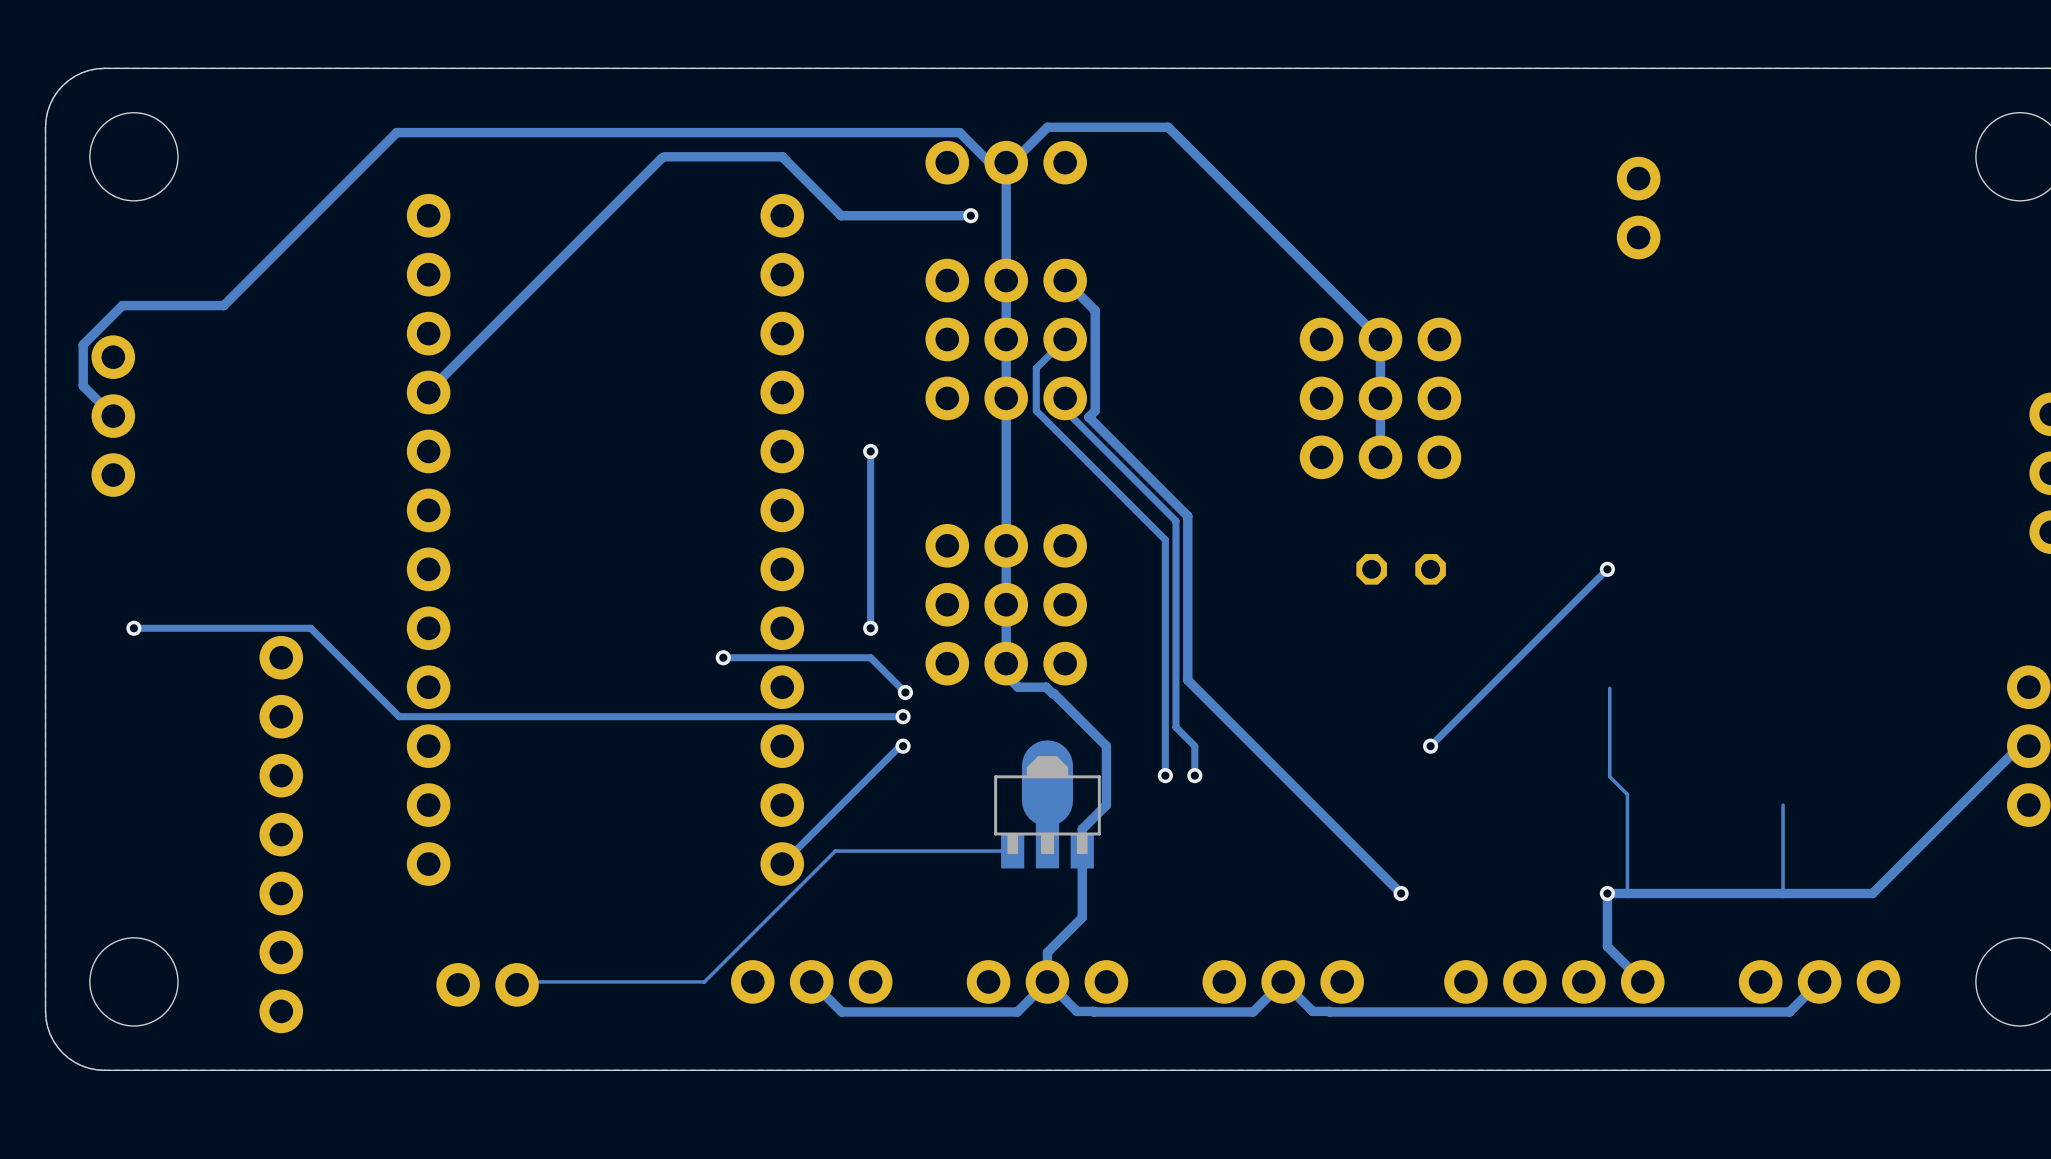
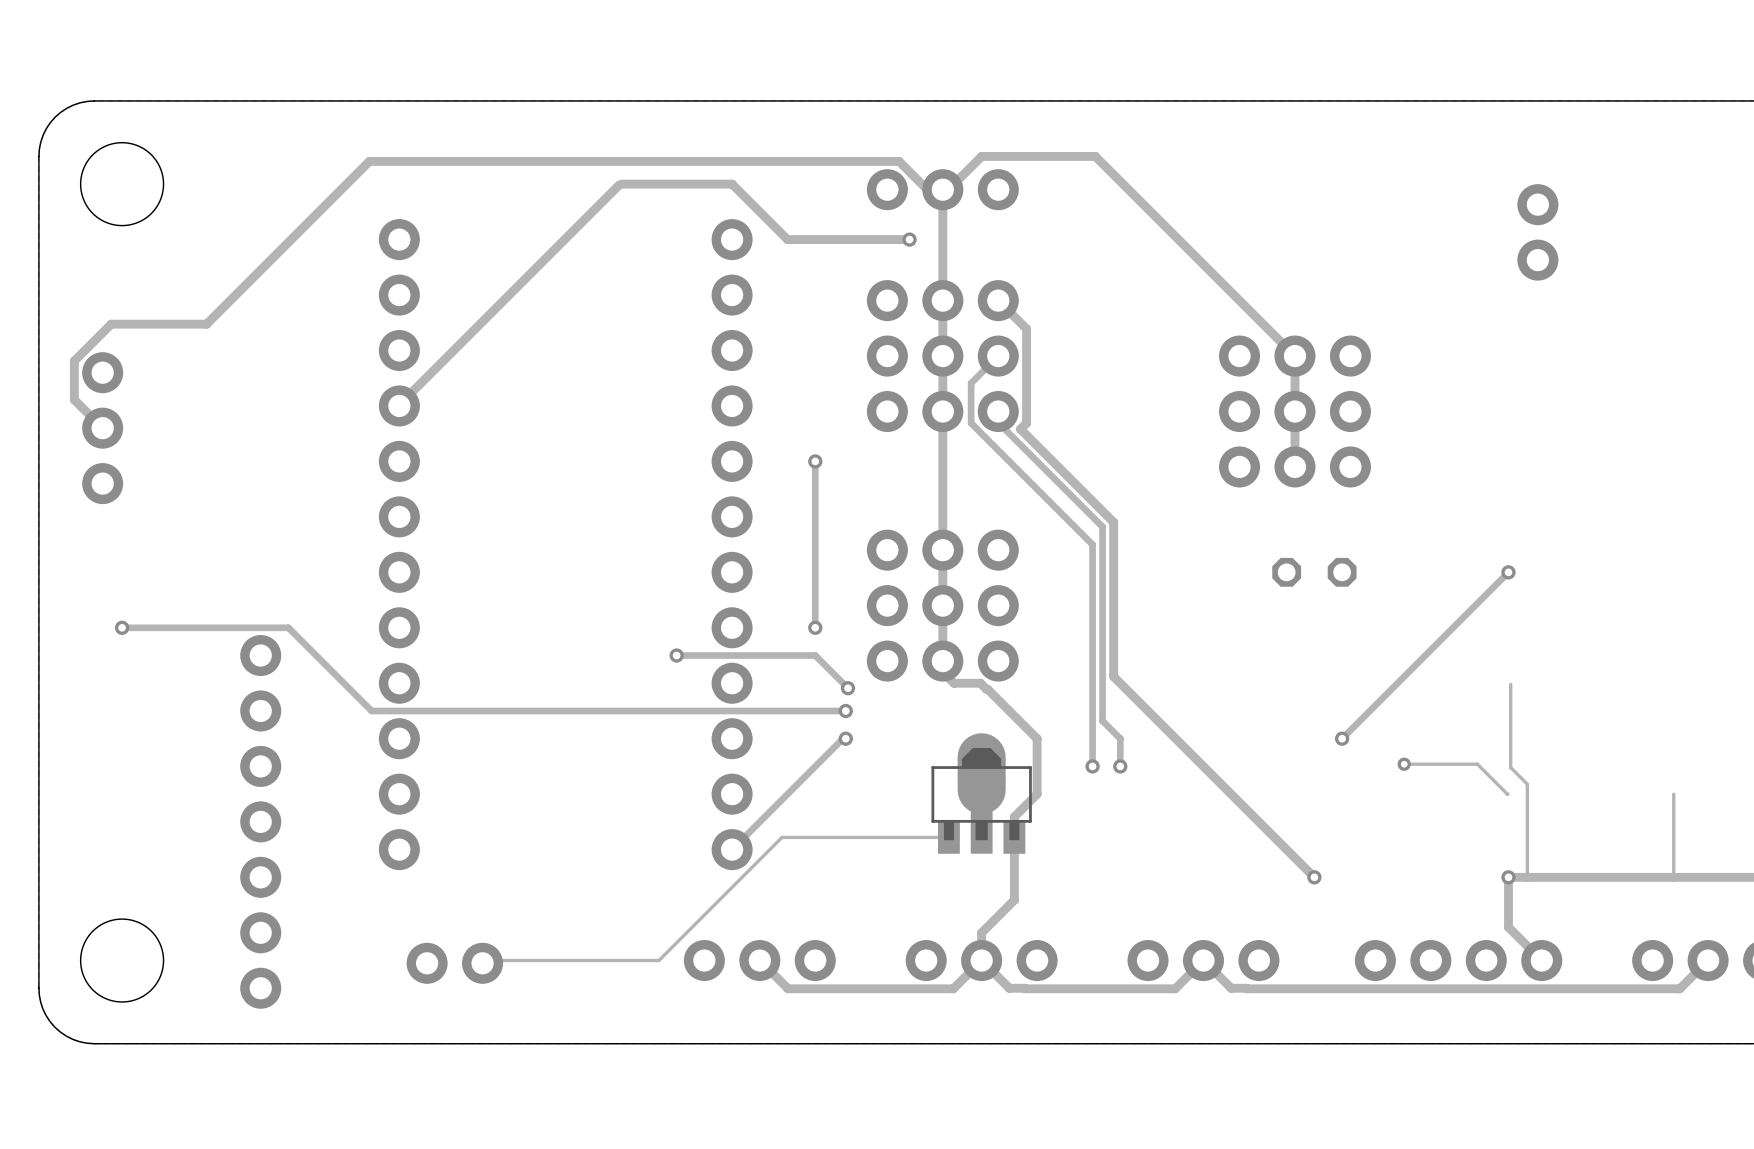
track: none -> (1404, 764) (1477, 764) (1507, 794)
via: none -> (1404, 764)

